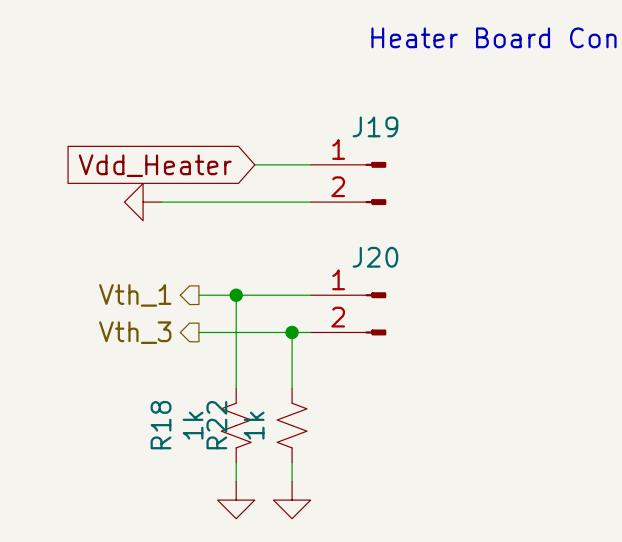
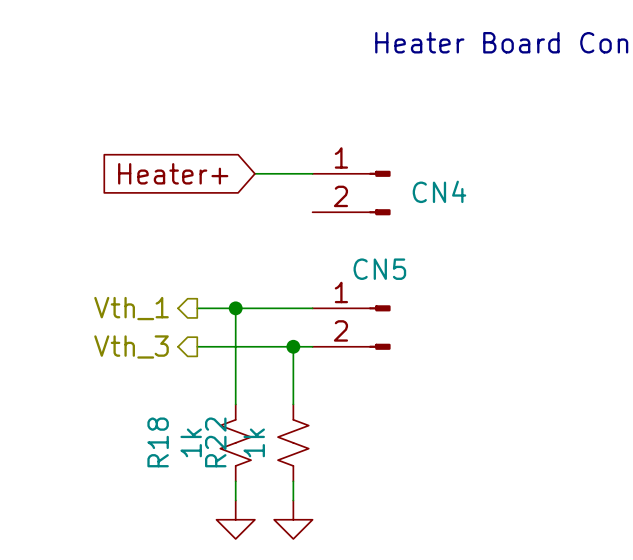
J19 name: J19 (375, 126) -> CN4 (439, 191)
global label: Vdd_Heater (155, 165) -> Heater+ (173, 173)
power symbol: (143, 202) -> none
wire: (161, 202) (310, 202) -> none
J20 name: J20 (375, 257) -> CN5 (379, 269)

